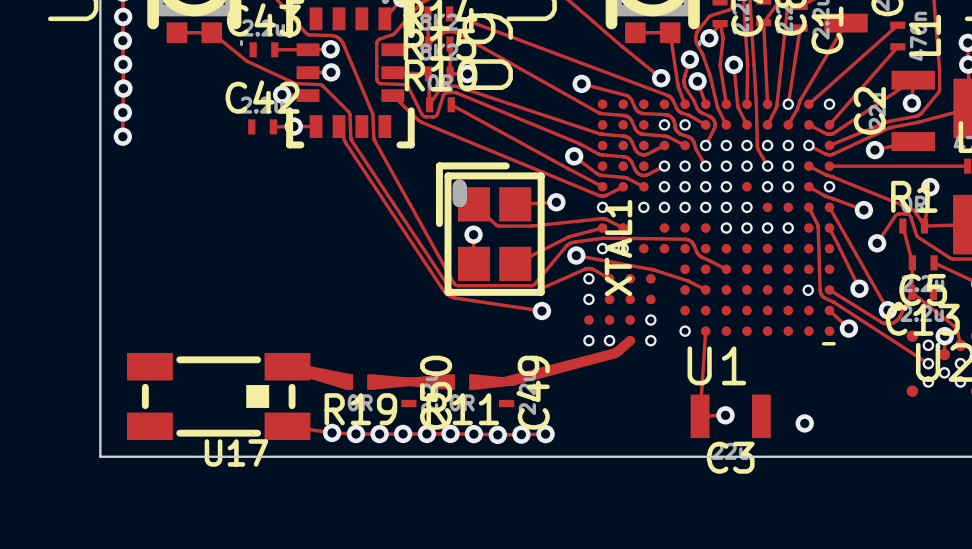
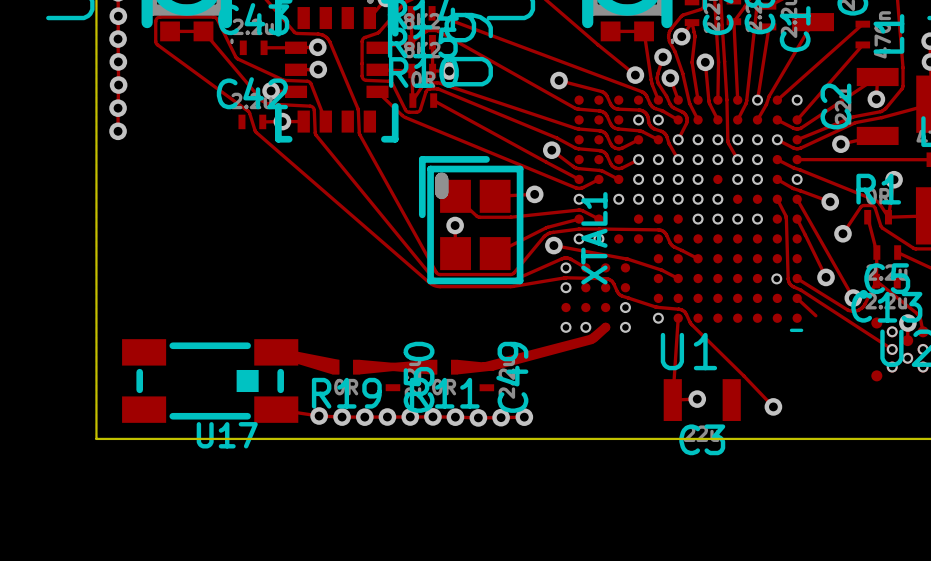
track: (211, 32) (247, 61) -> (628, 298) (619, 294) (612, 281) (606, 278) (564, 277) (510, 286) (440, 286) (430, 283) (256, 132) (248, 111) (157, 44) (156, 19) (160, 17) (215, 17) (237, 59)
track: (319, 84) (349, 112) (351, 140) (448, 287) (457, 292) -> (203, 31) (262, 100) (270, 104) (313, 107) (316, 135) (432, 276) (440, 280)
track: (339, 126) (346, 144) (445, 293) (455, 298) (541, 311) -> (325, 121) (310, 83) (307, 81)
track: none -> (628, 298) (655, 306) (683, 311) (691, 324) (743, 375)
via: (541, 311) -> none
via: (848, 328) -> none
track: none -> (743, 376) (773, 406)

